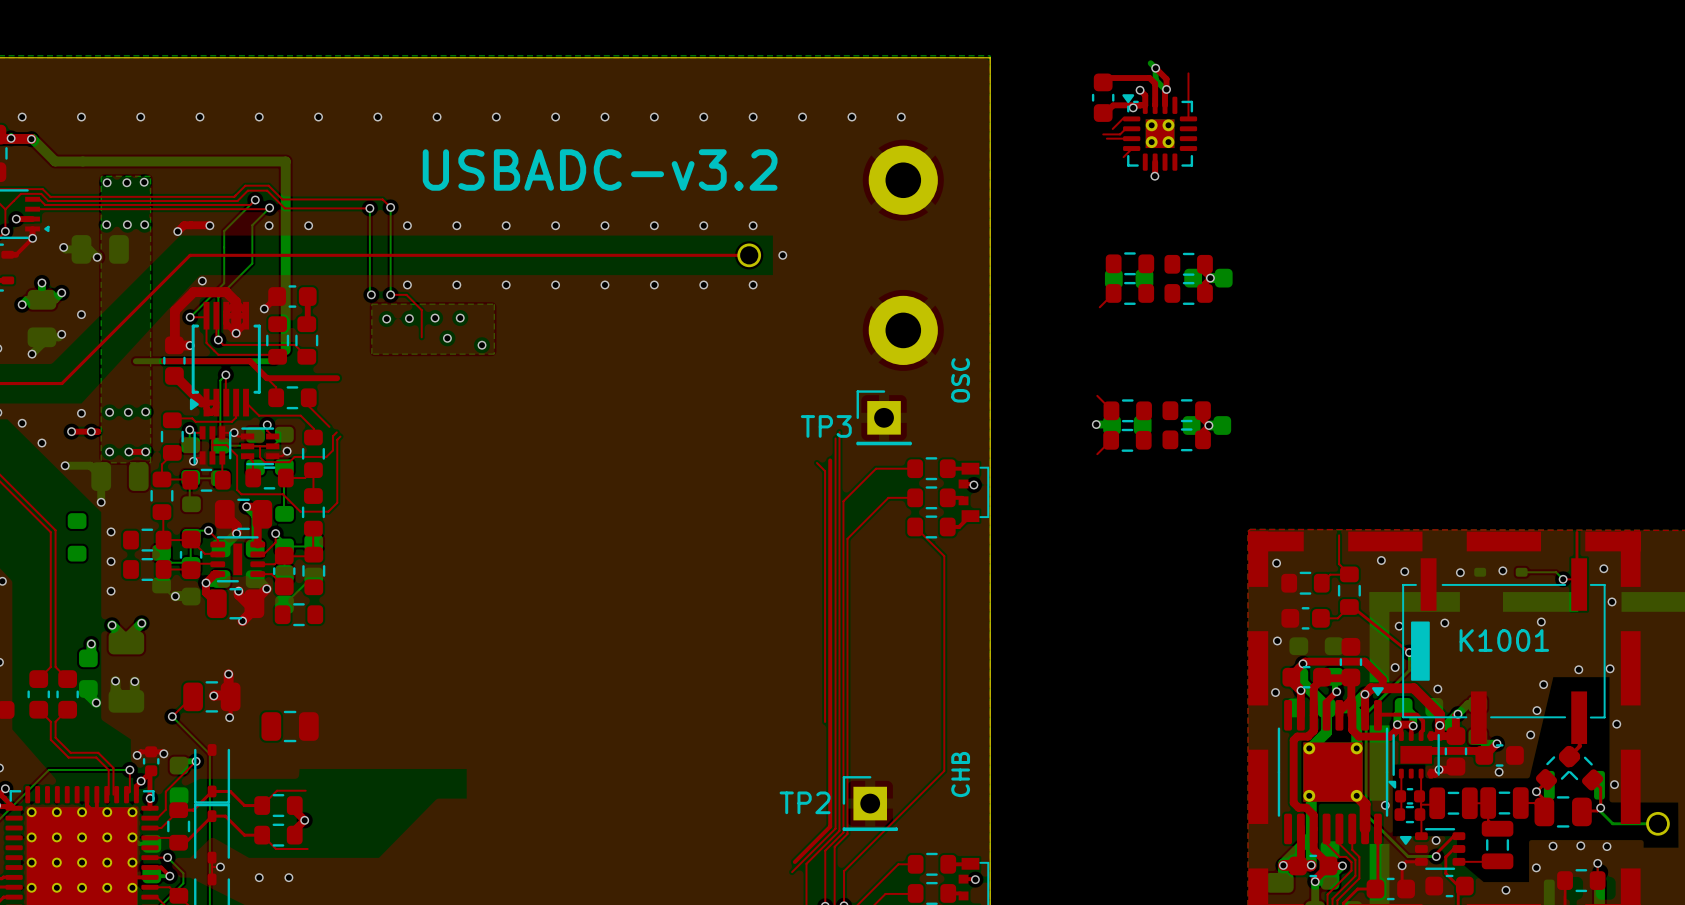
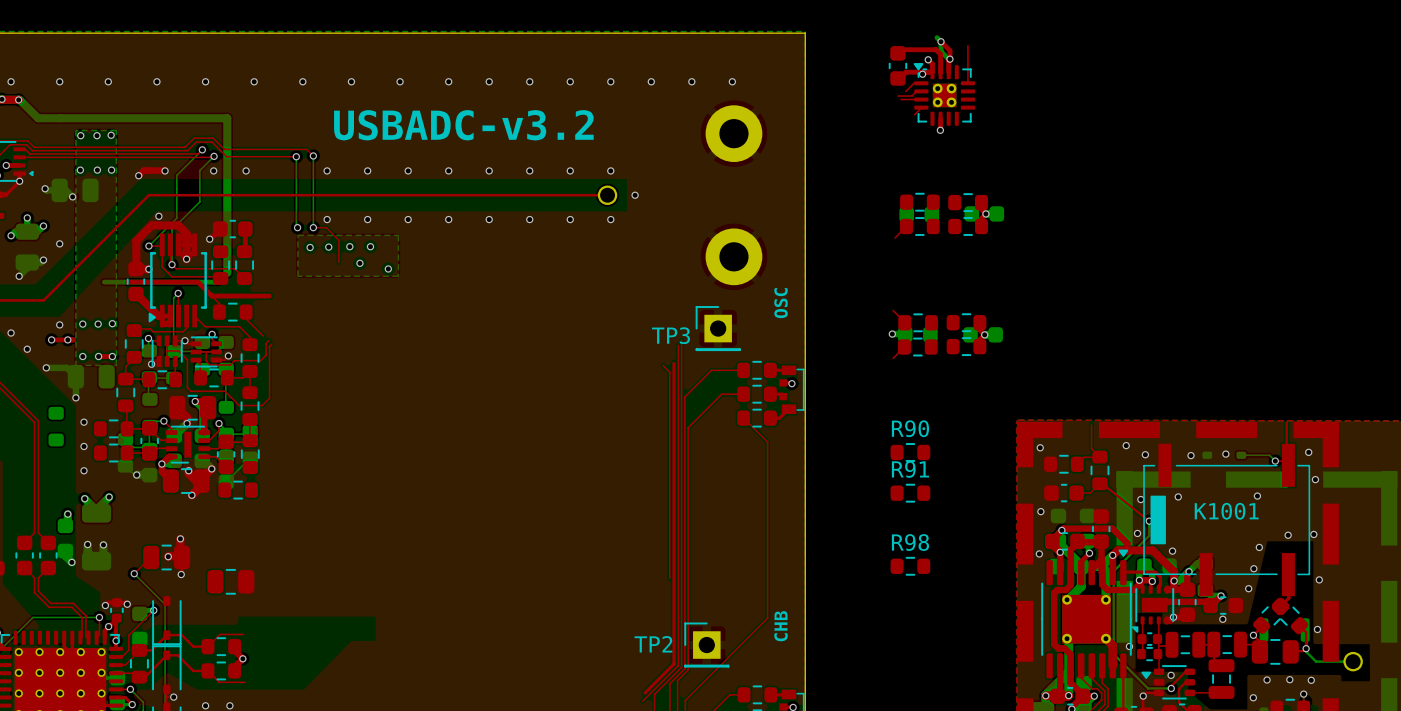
R90: none -> (910, 452)
R91: none -> (910, 493)
R98: none -> (910, 566)

